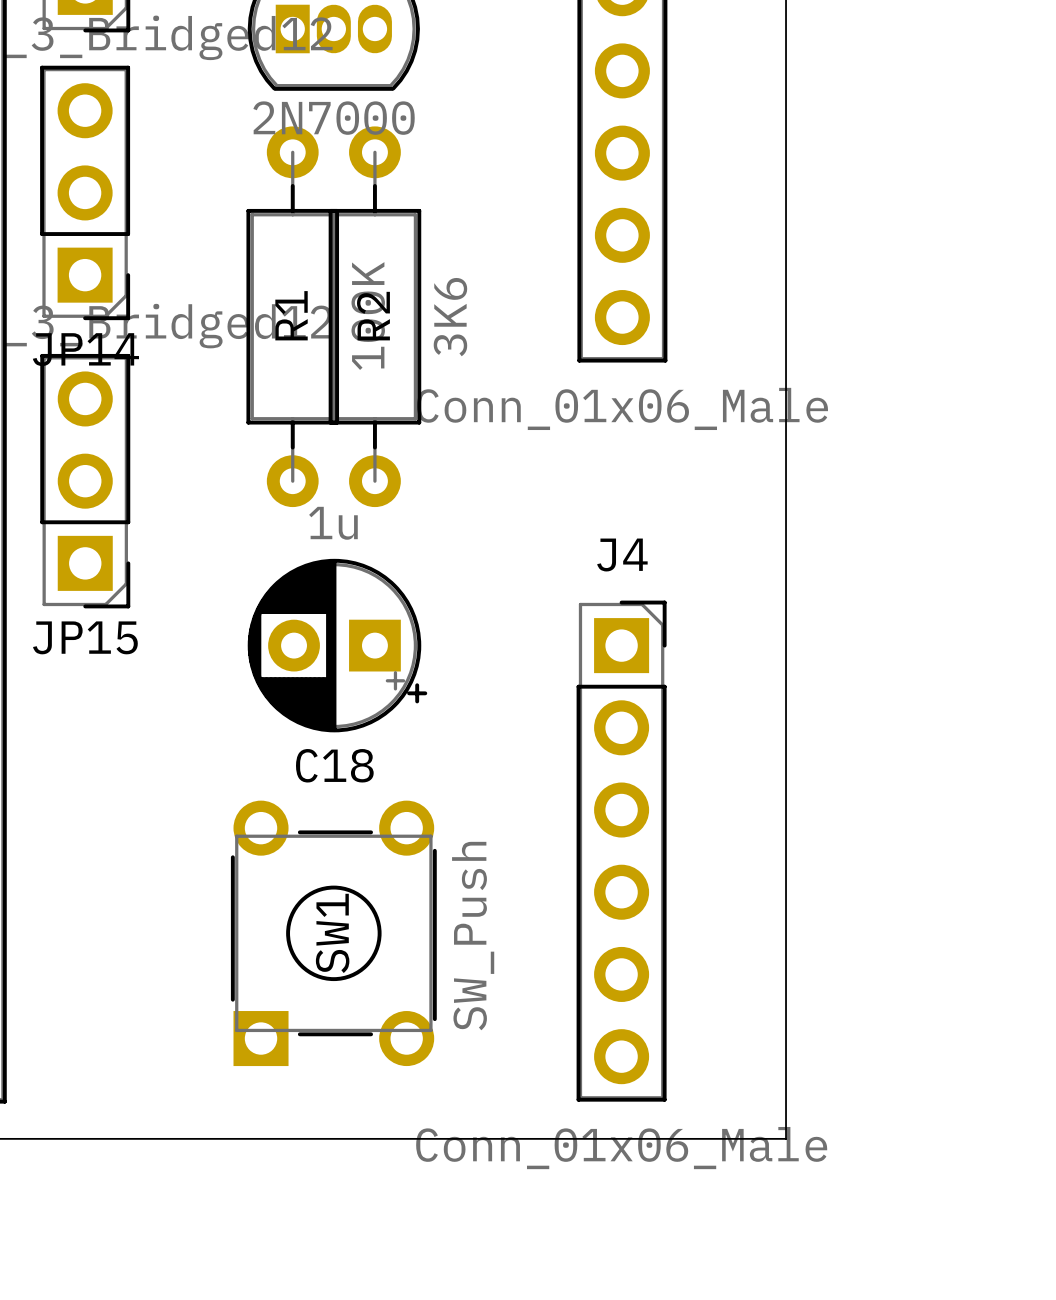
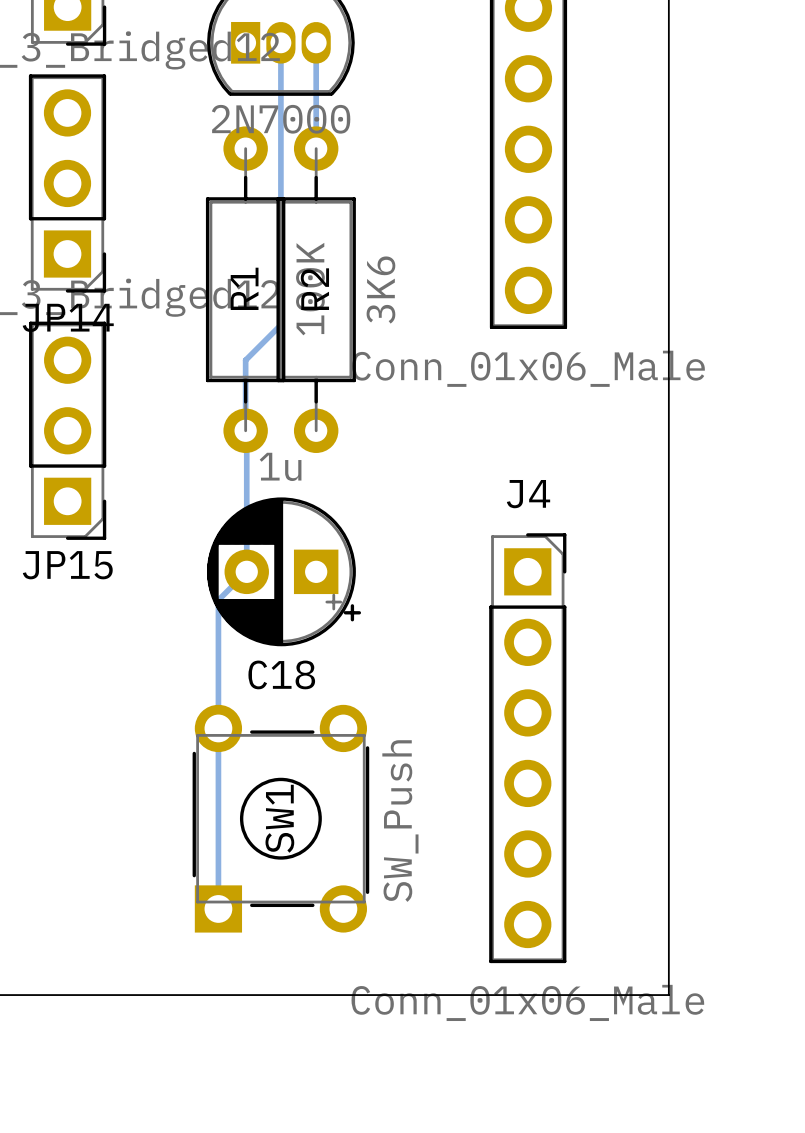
bottom track: none -> (280, 42) (280, 324) (245, 360) (246, 571) (218, 600) (218, 908)
bottom track: none -> (316, 42) (316, 148)

